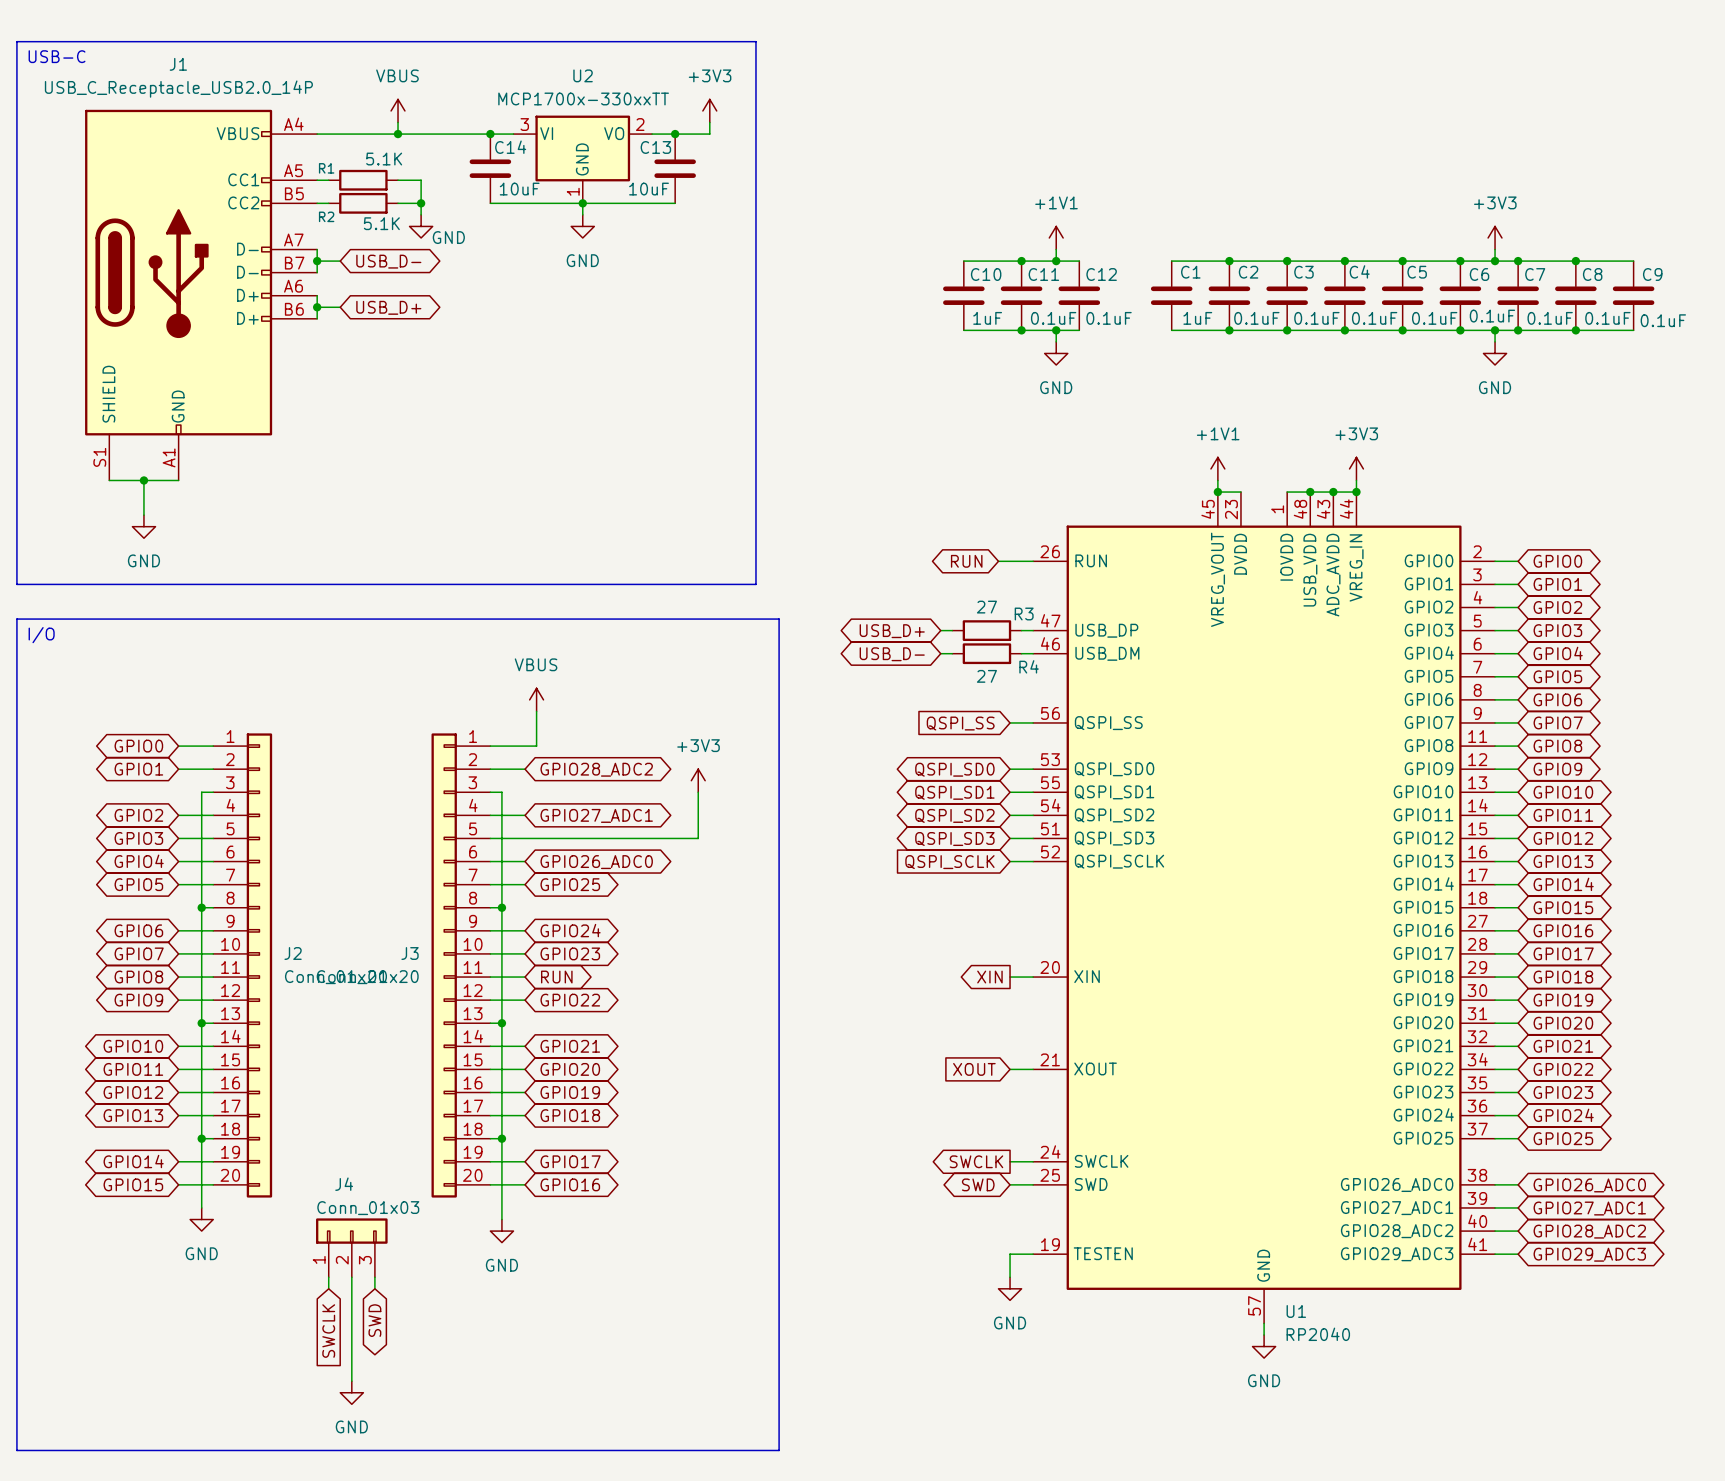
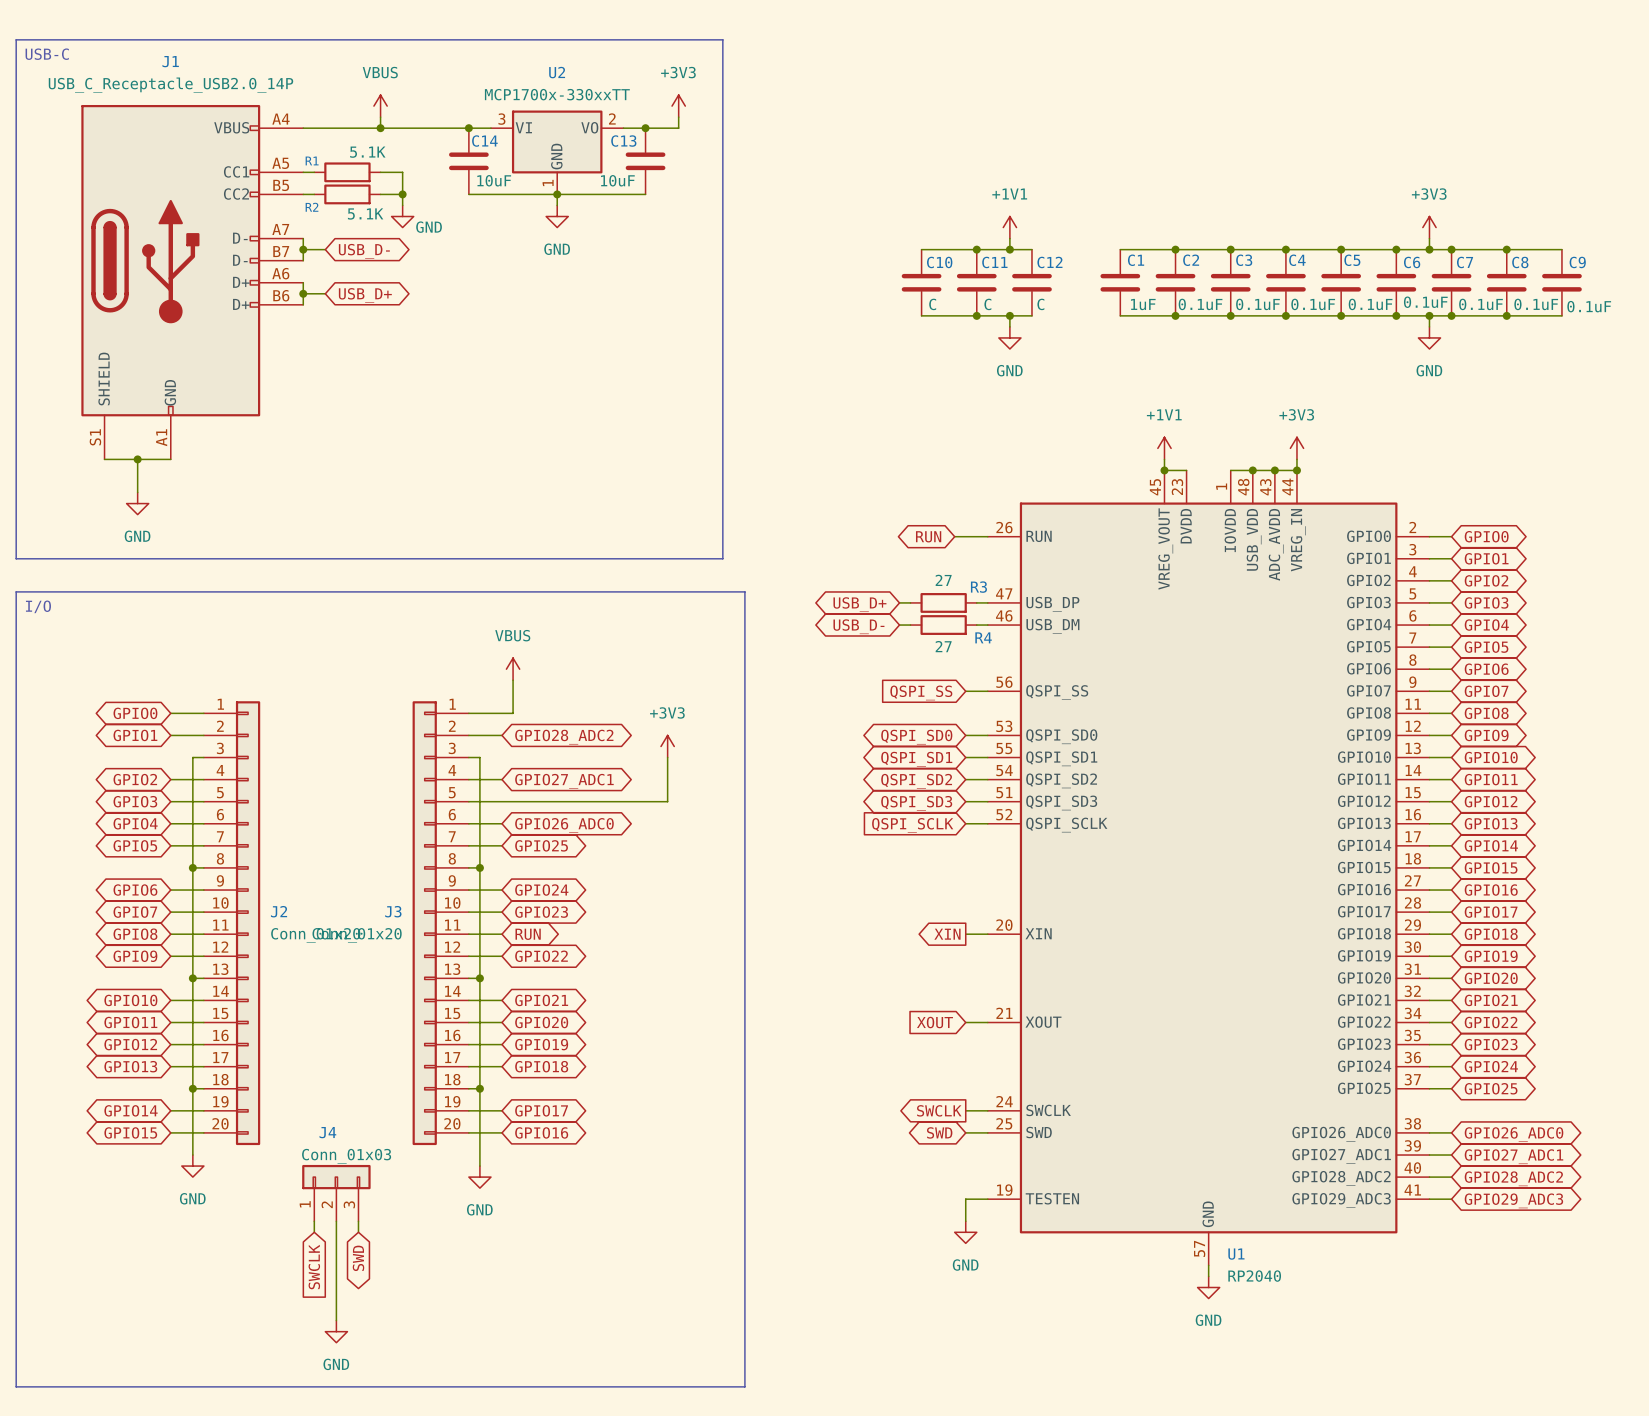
C10 value: 1uF (987, 318) -> C (932, 304)
C11 value: 0.1uF (1053, 318) -> C (987, 304)
C12 value: 0.1uF (1109, 318) -> C (1040, 304)

